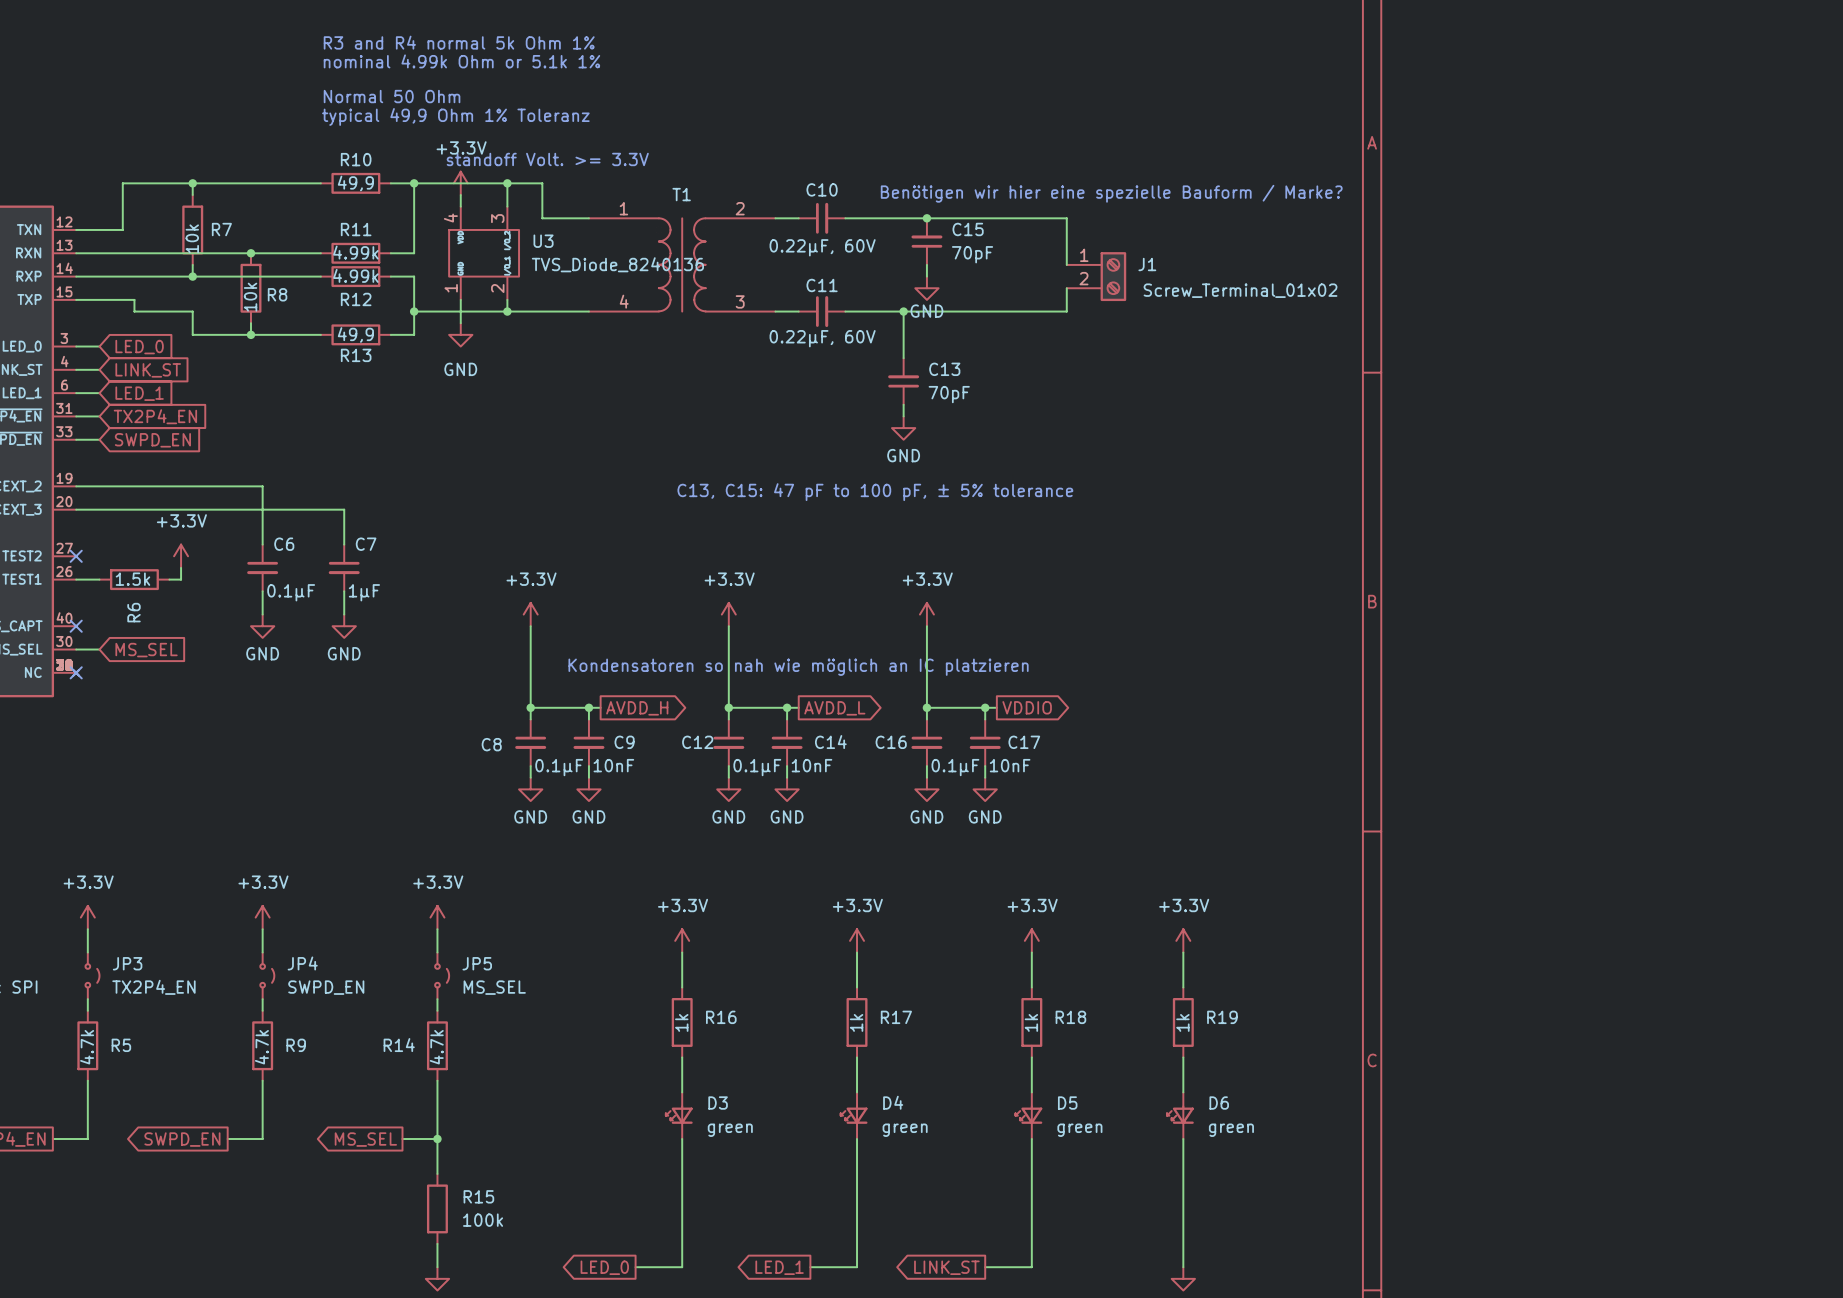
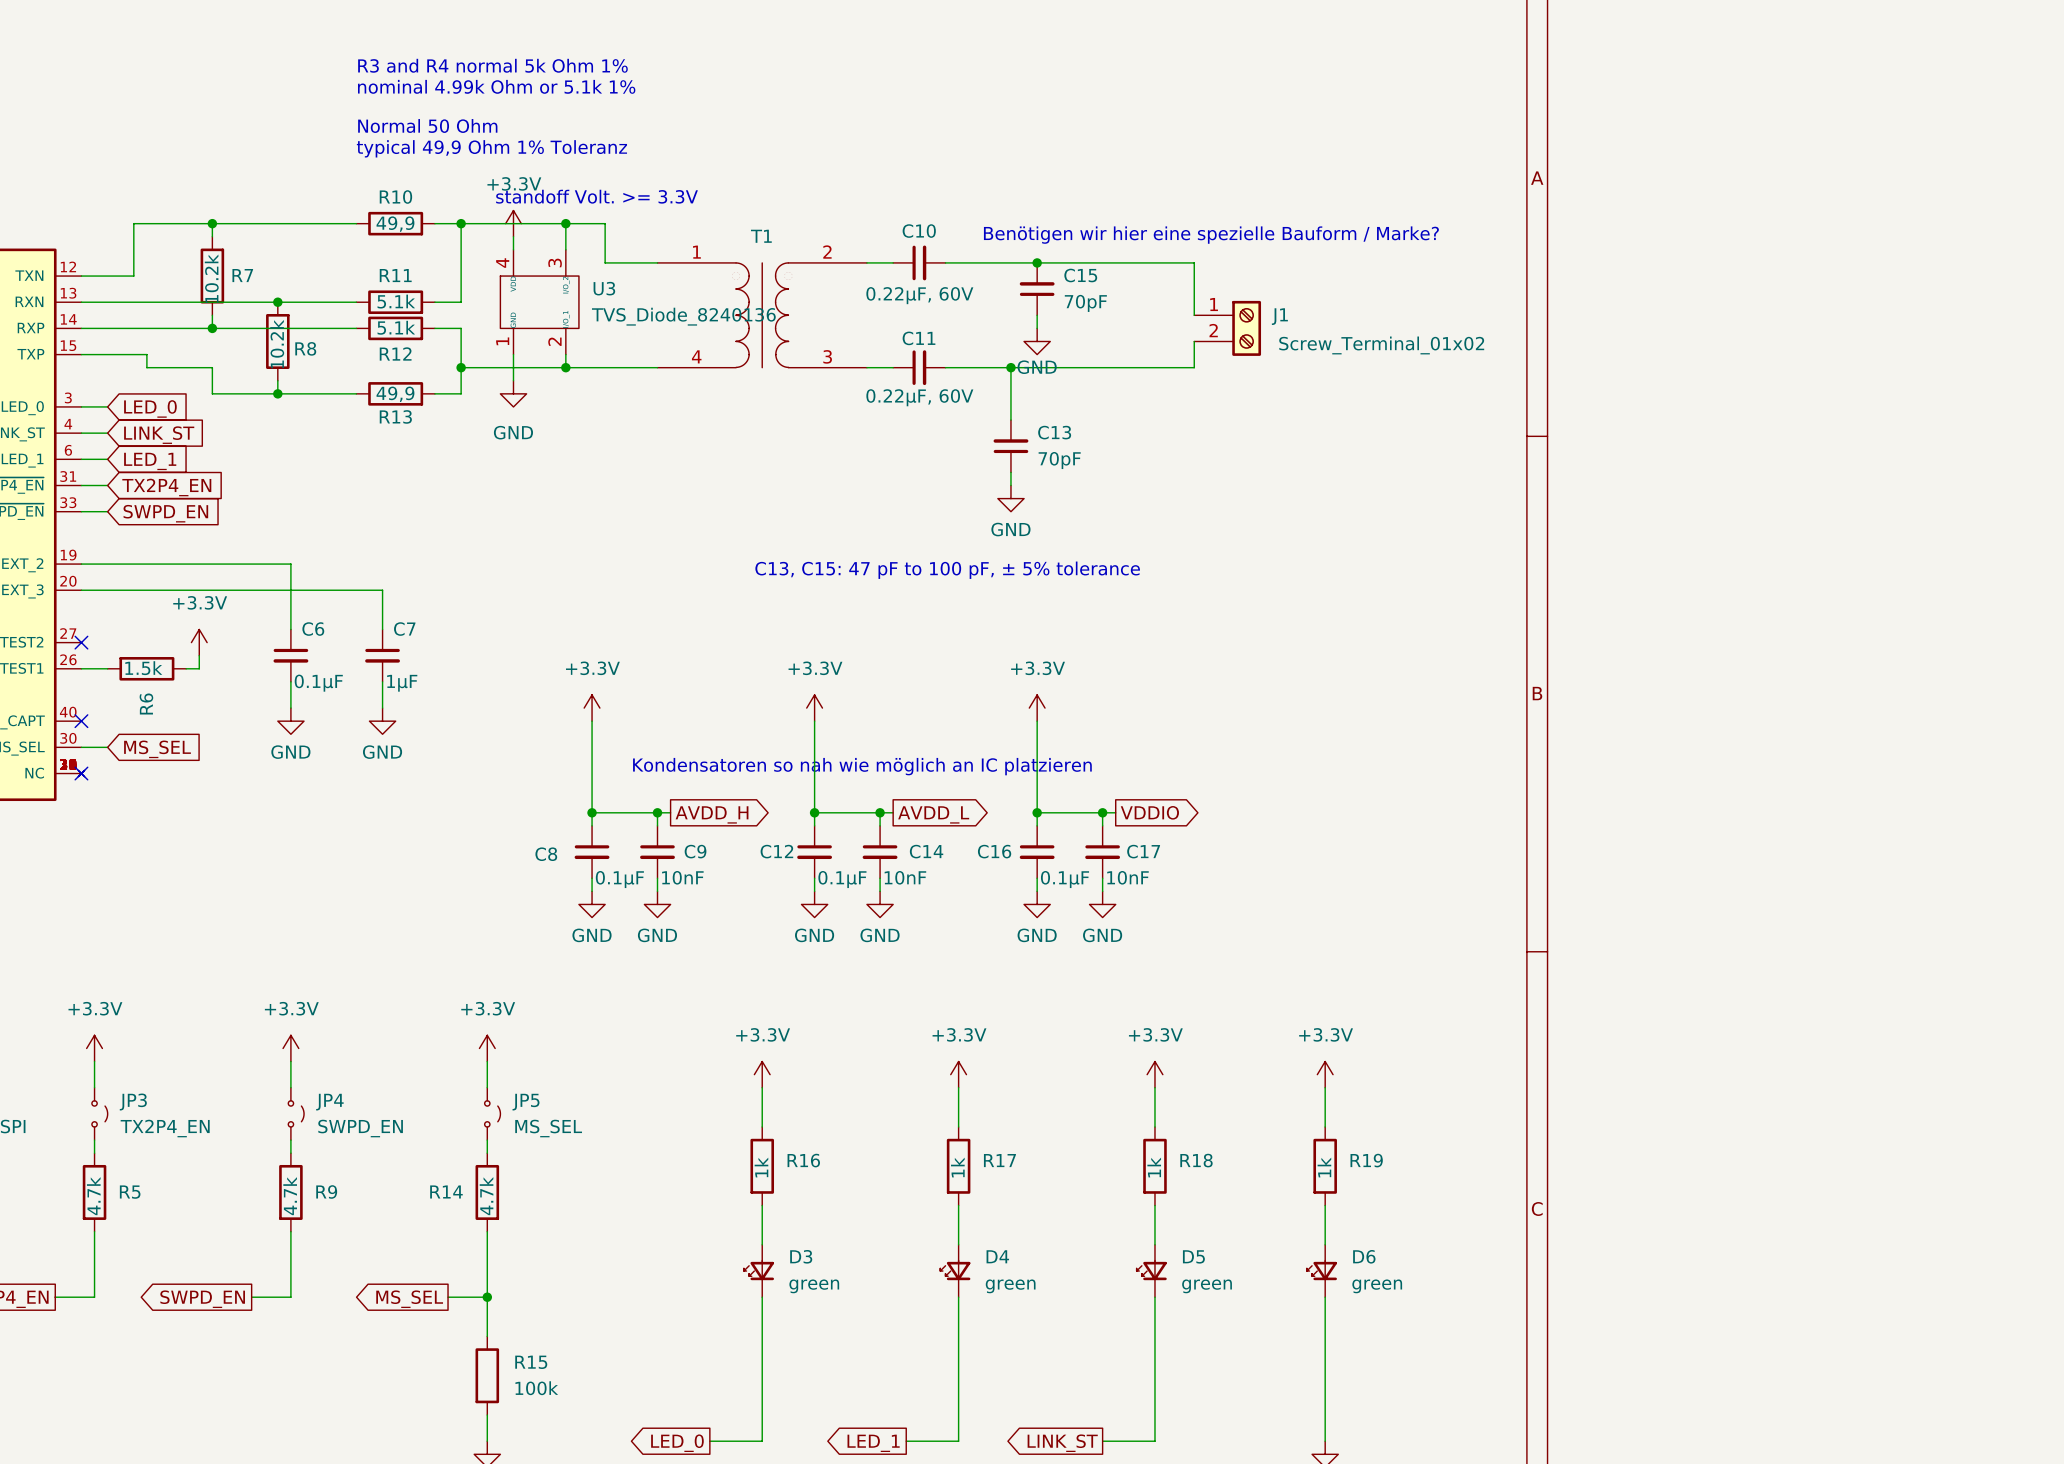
R7 value: 10k (192, 238) -> 10.2k (211, 278)
R11 value: 4.99k (355, 252) -> 5.1k (396, 301)
R12 value: 4.99k (355, 275) -> 5.1k (396, 327)
R8 value: 10k (250, 297) -> 10.2k (277, 344)

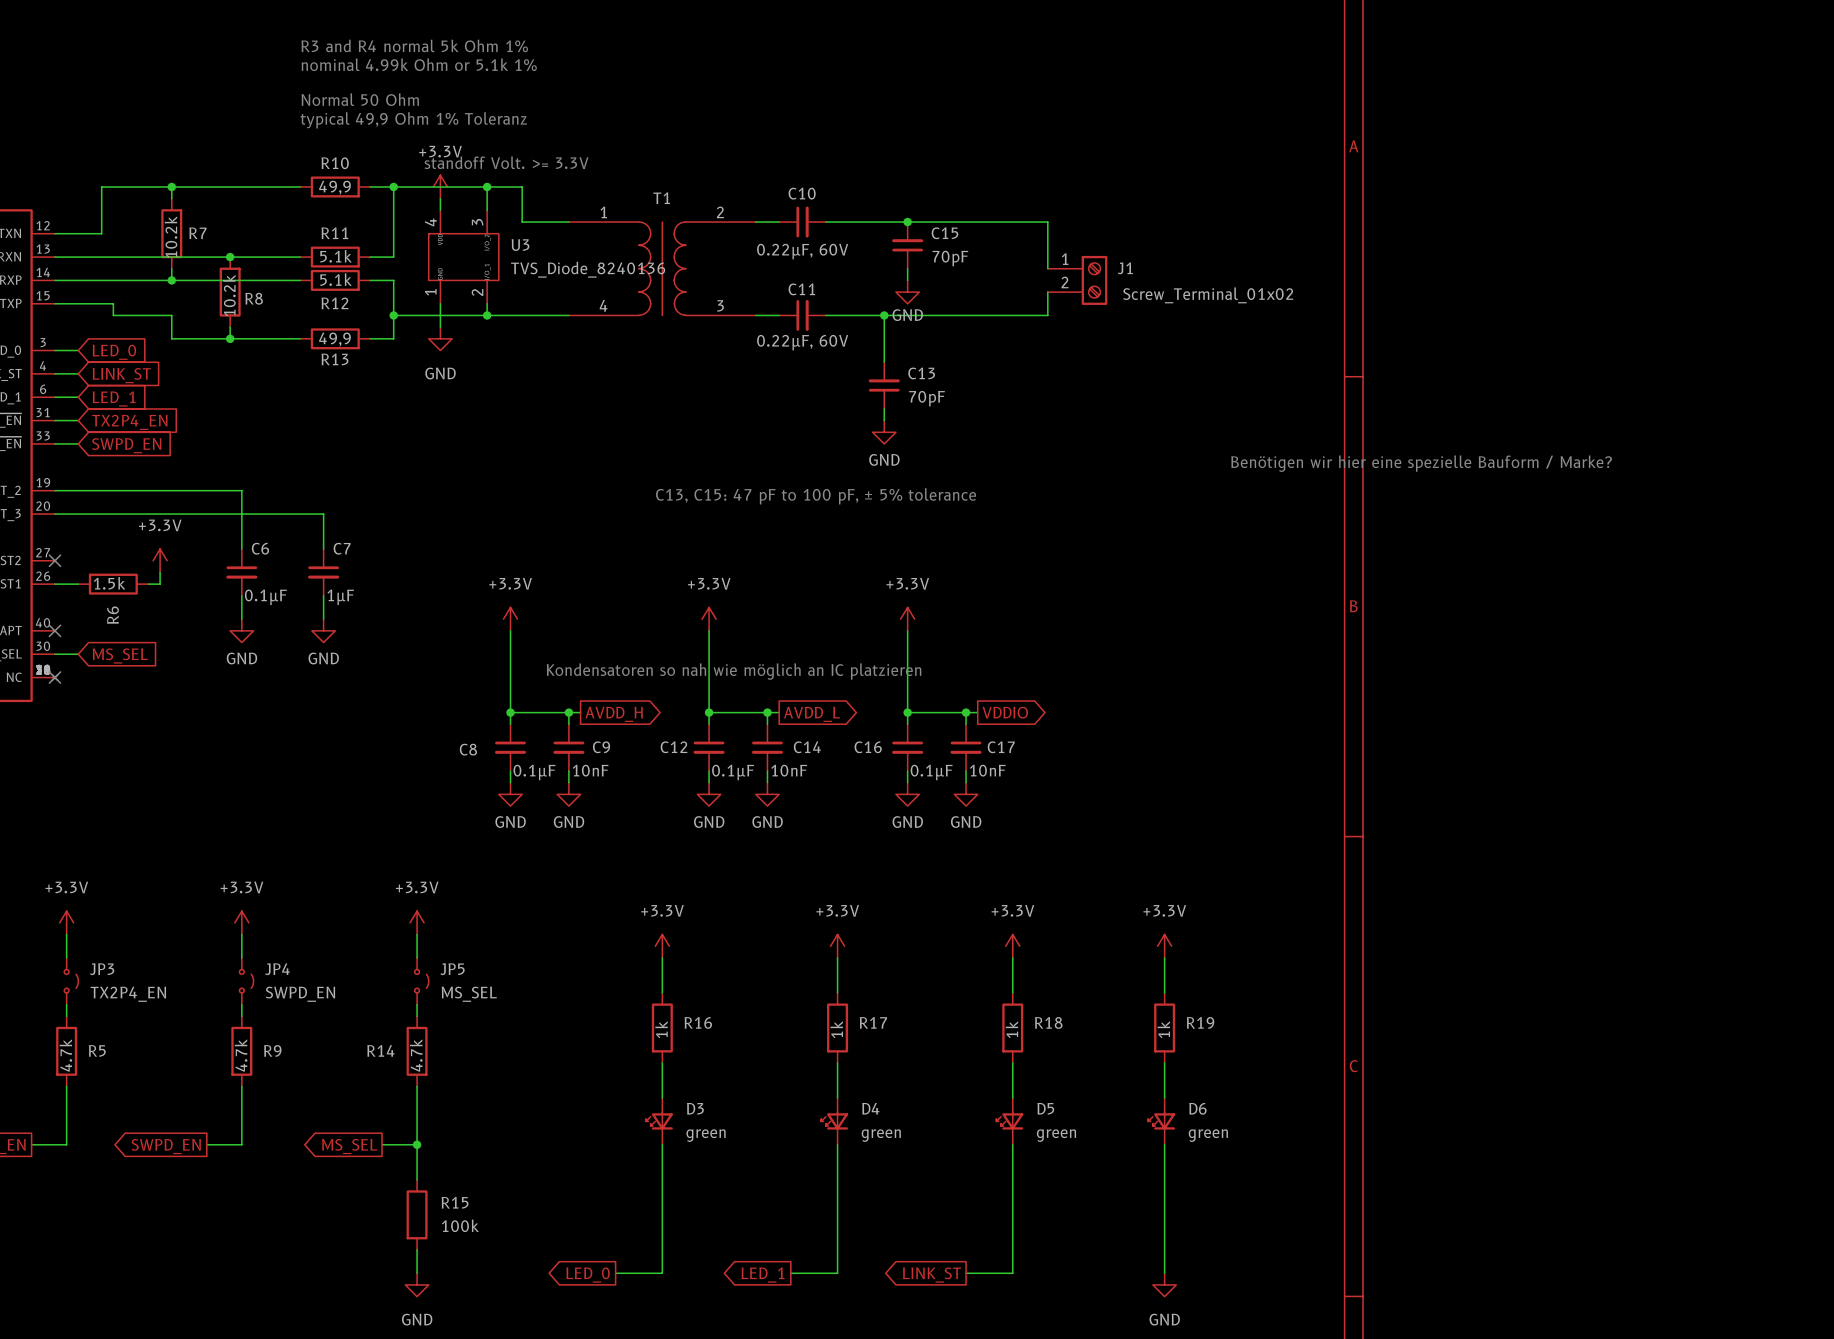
text: Benötigen wir hier eine spezielle Bauform / Marke? (1211, 235) -> none
text: none -> Benötigen wir hier eine spezielle Bauform / Marke? (1421, 463)

